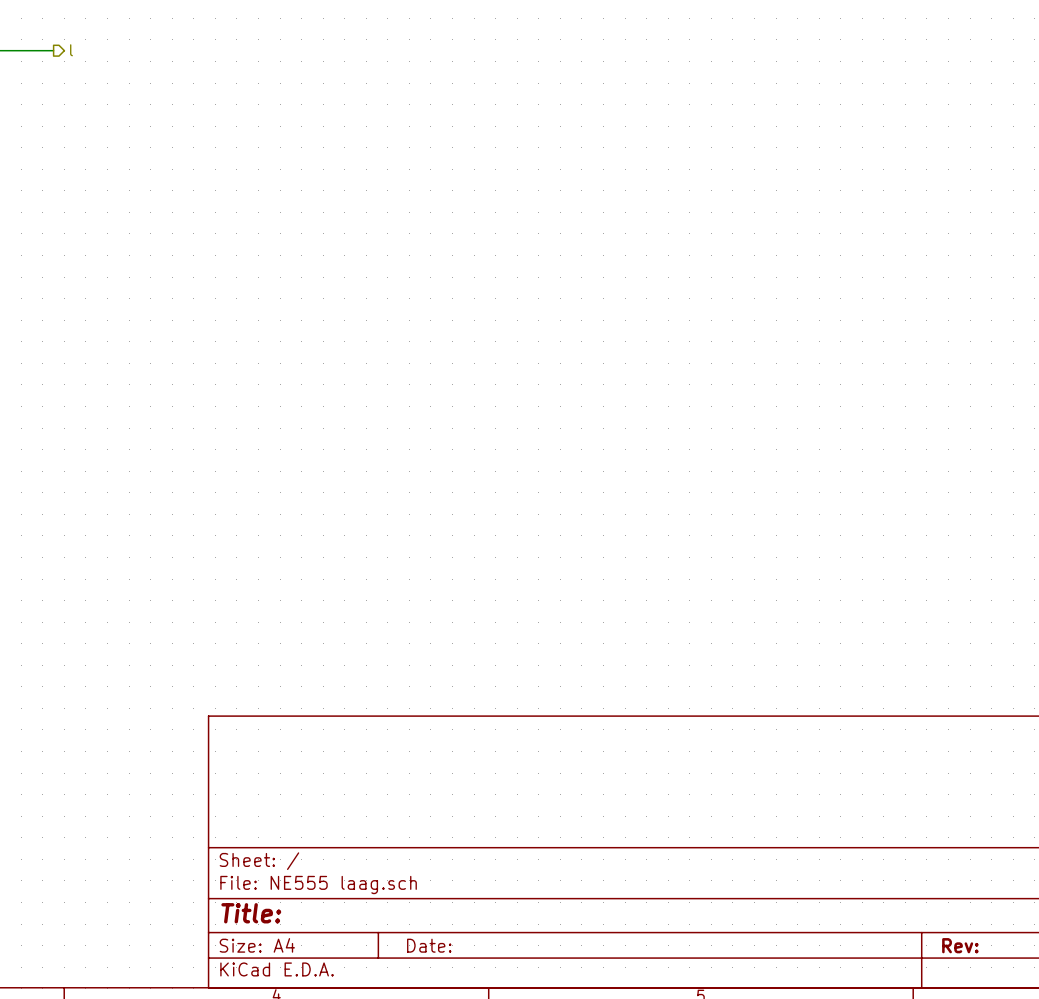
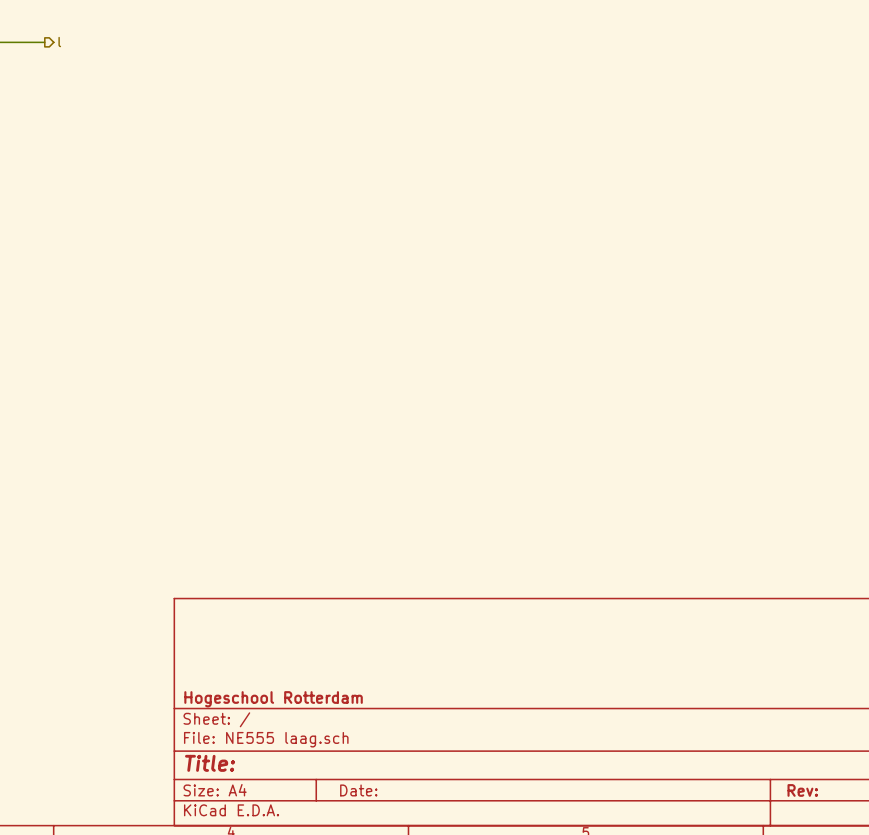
title block: none -> Hogeschool Rotterdam (273, 699)

